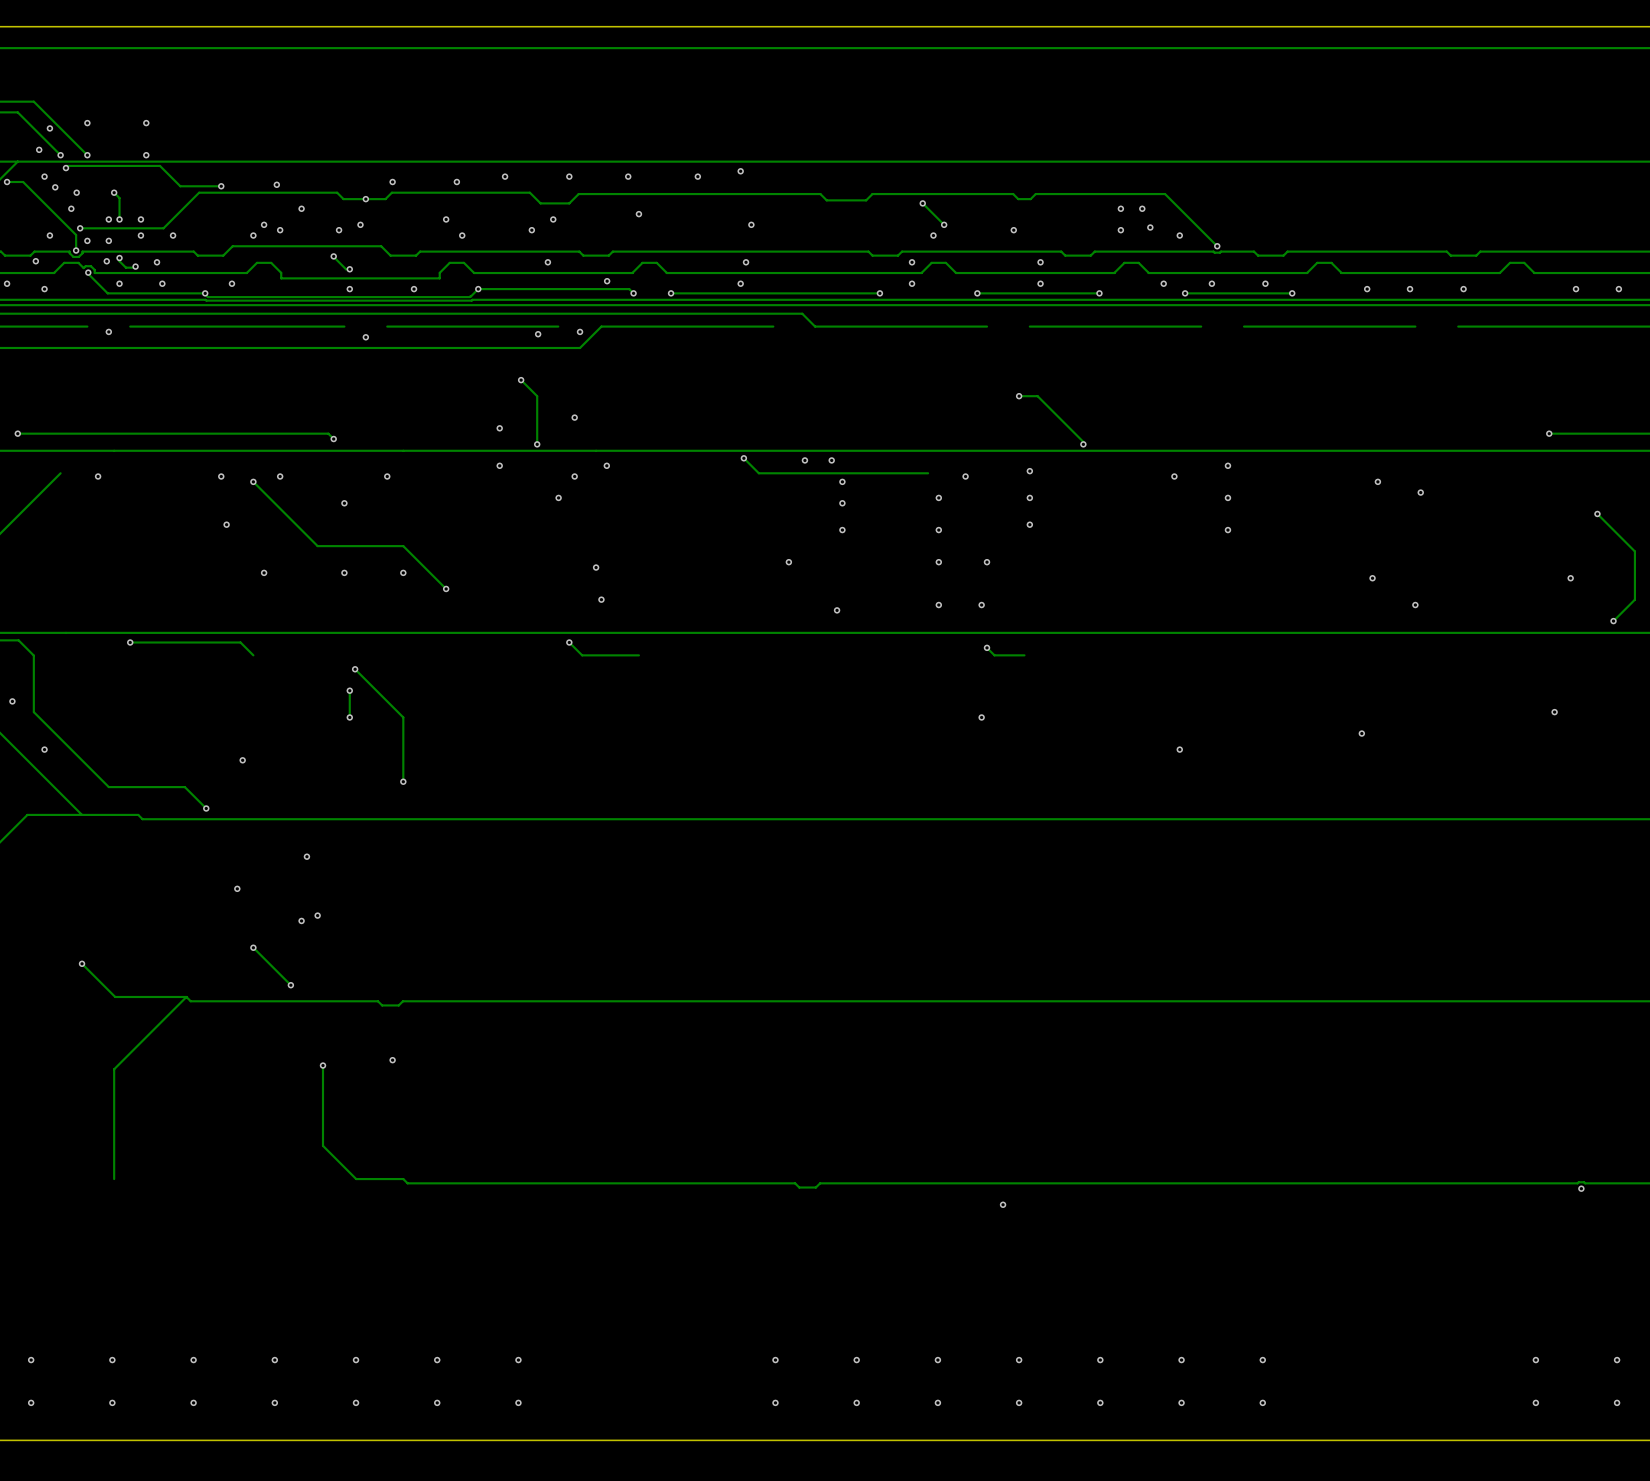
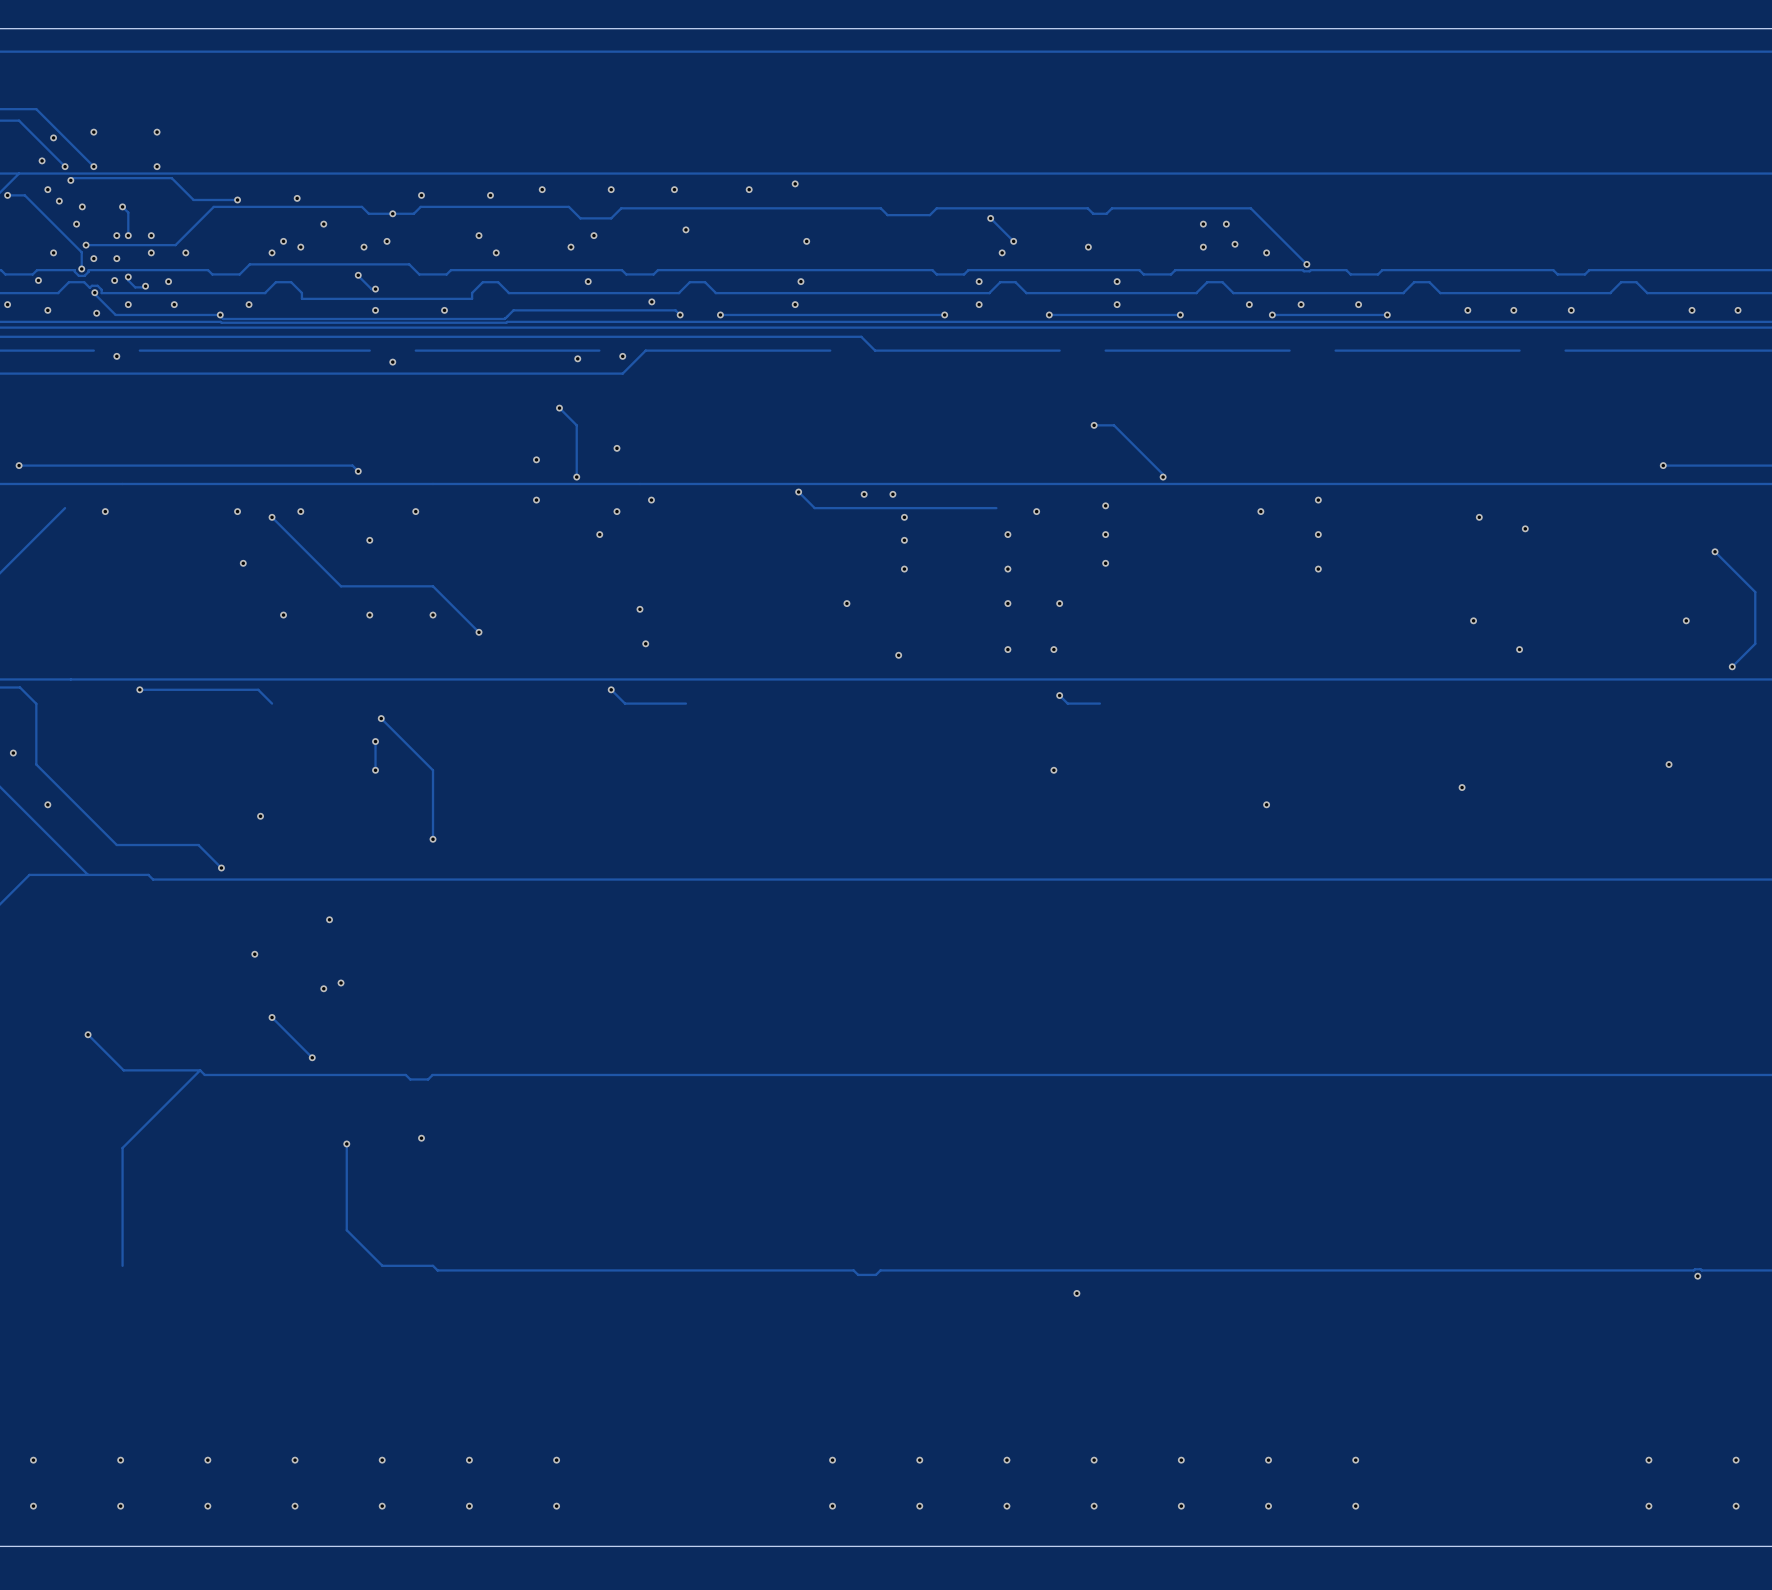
via: (478, 289) -> none
via: none -> (96, 313)

